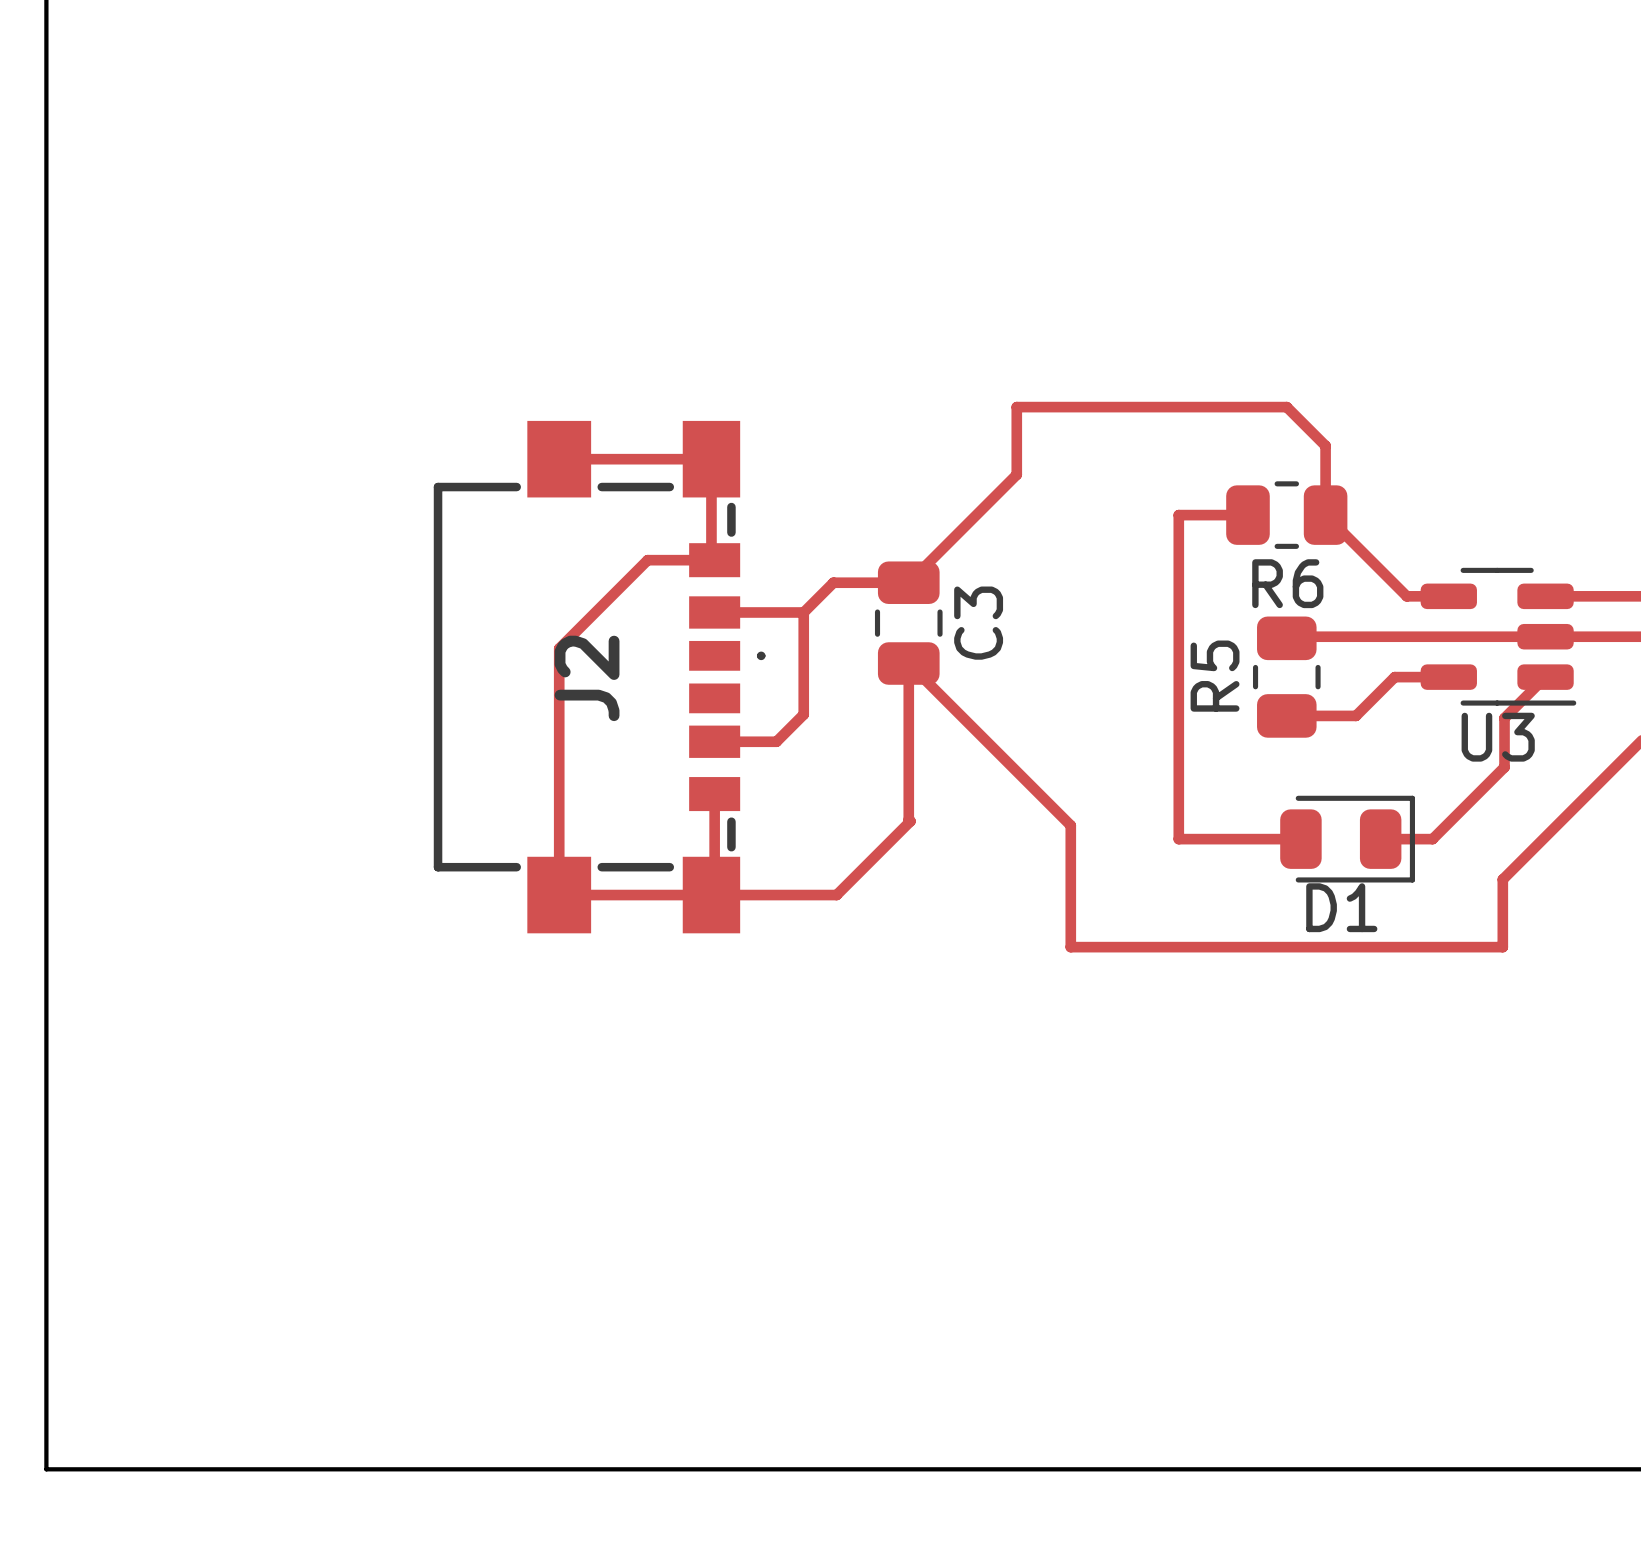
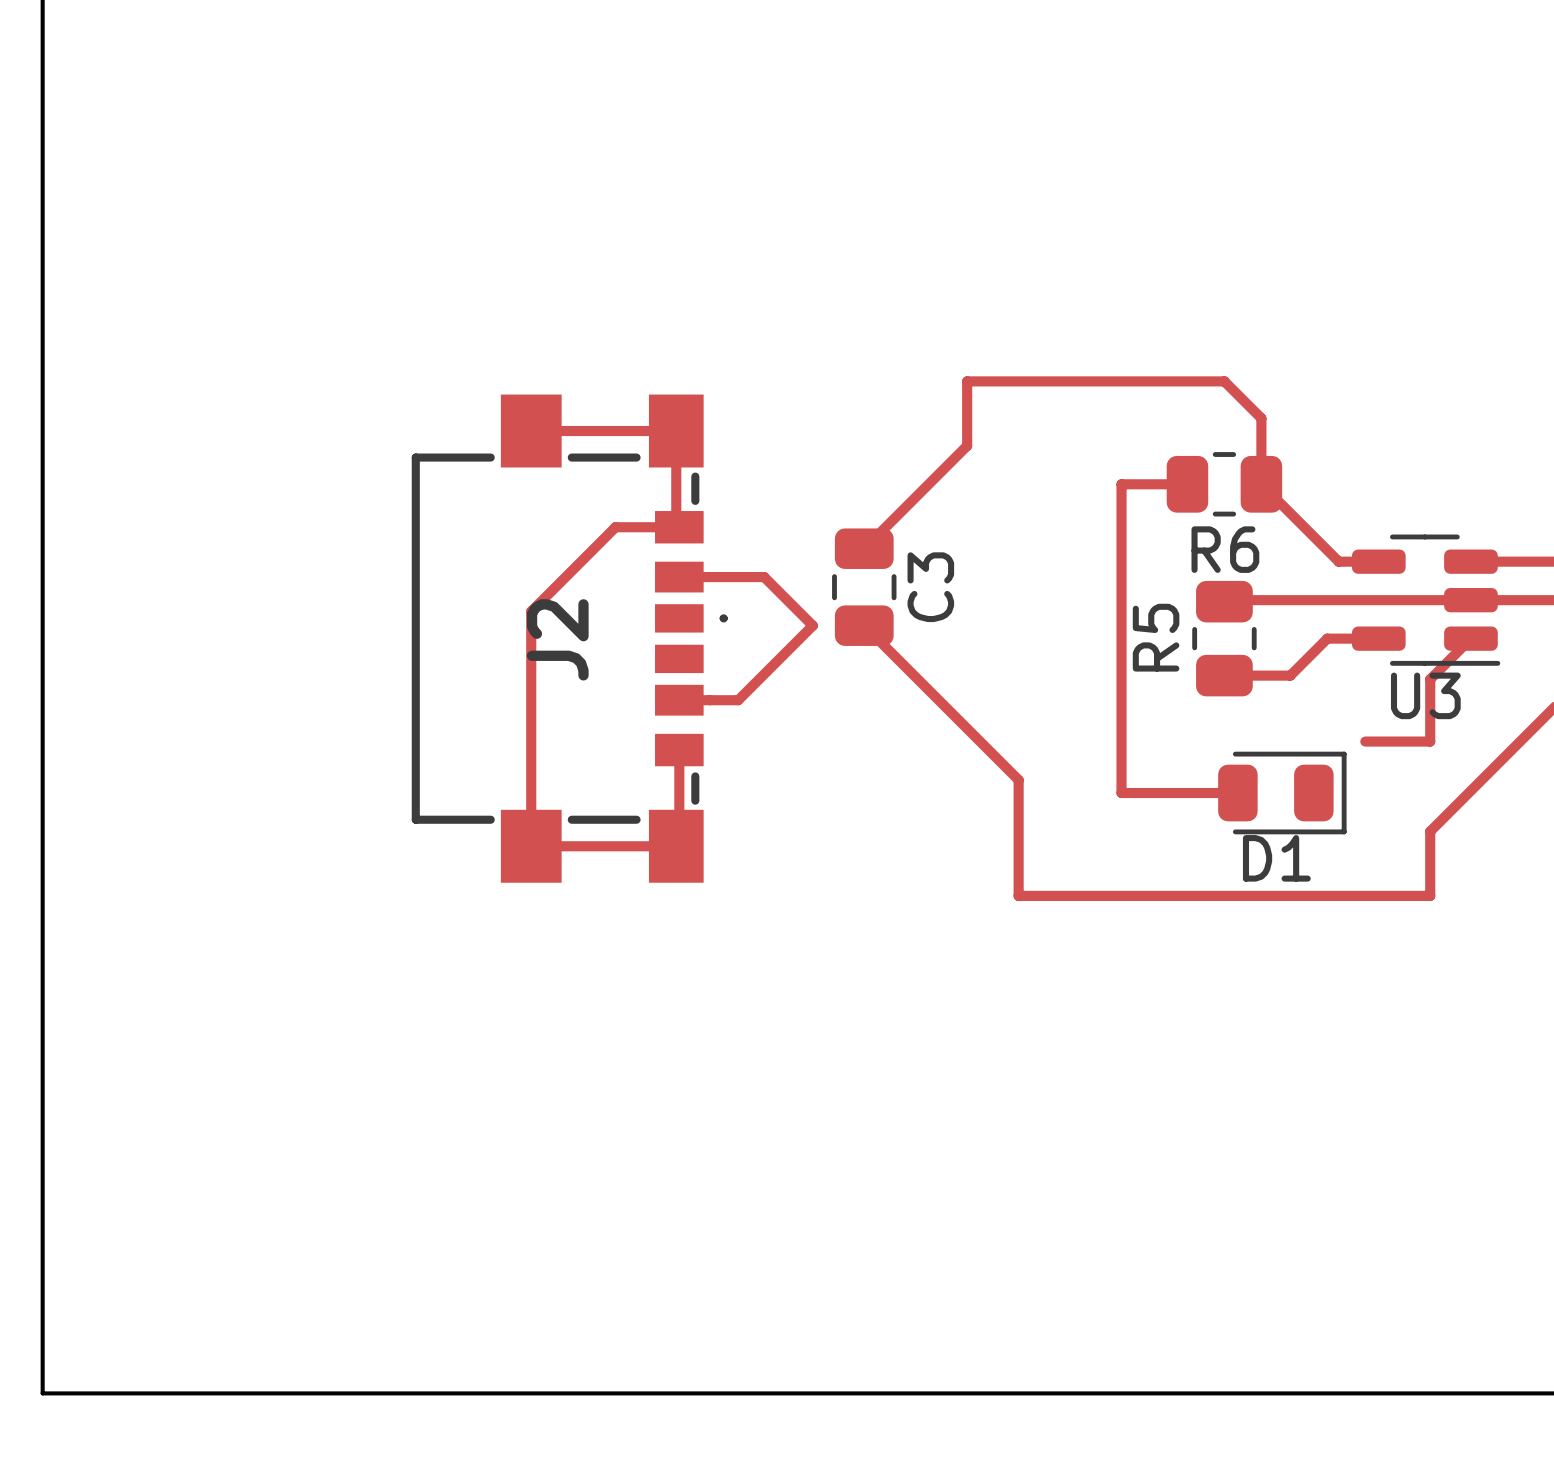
track: (908, 582) (833, 582) (803, 612) (803, 714) -> (764, 577) (812, 625) (764, 674)
track: (908, 663) (908, 819) (910, 821) (836, 895) (711, 895) -> none
track: (1504, 718) (1504, 767) (1432, 839) (1380, 839) -> (1431, 677) (1430, 679) (1430, 741) (1365, 741)

